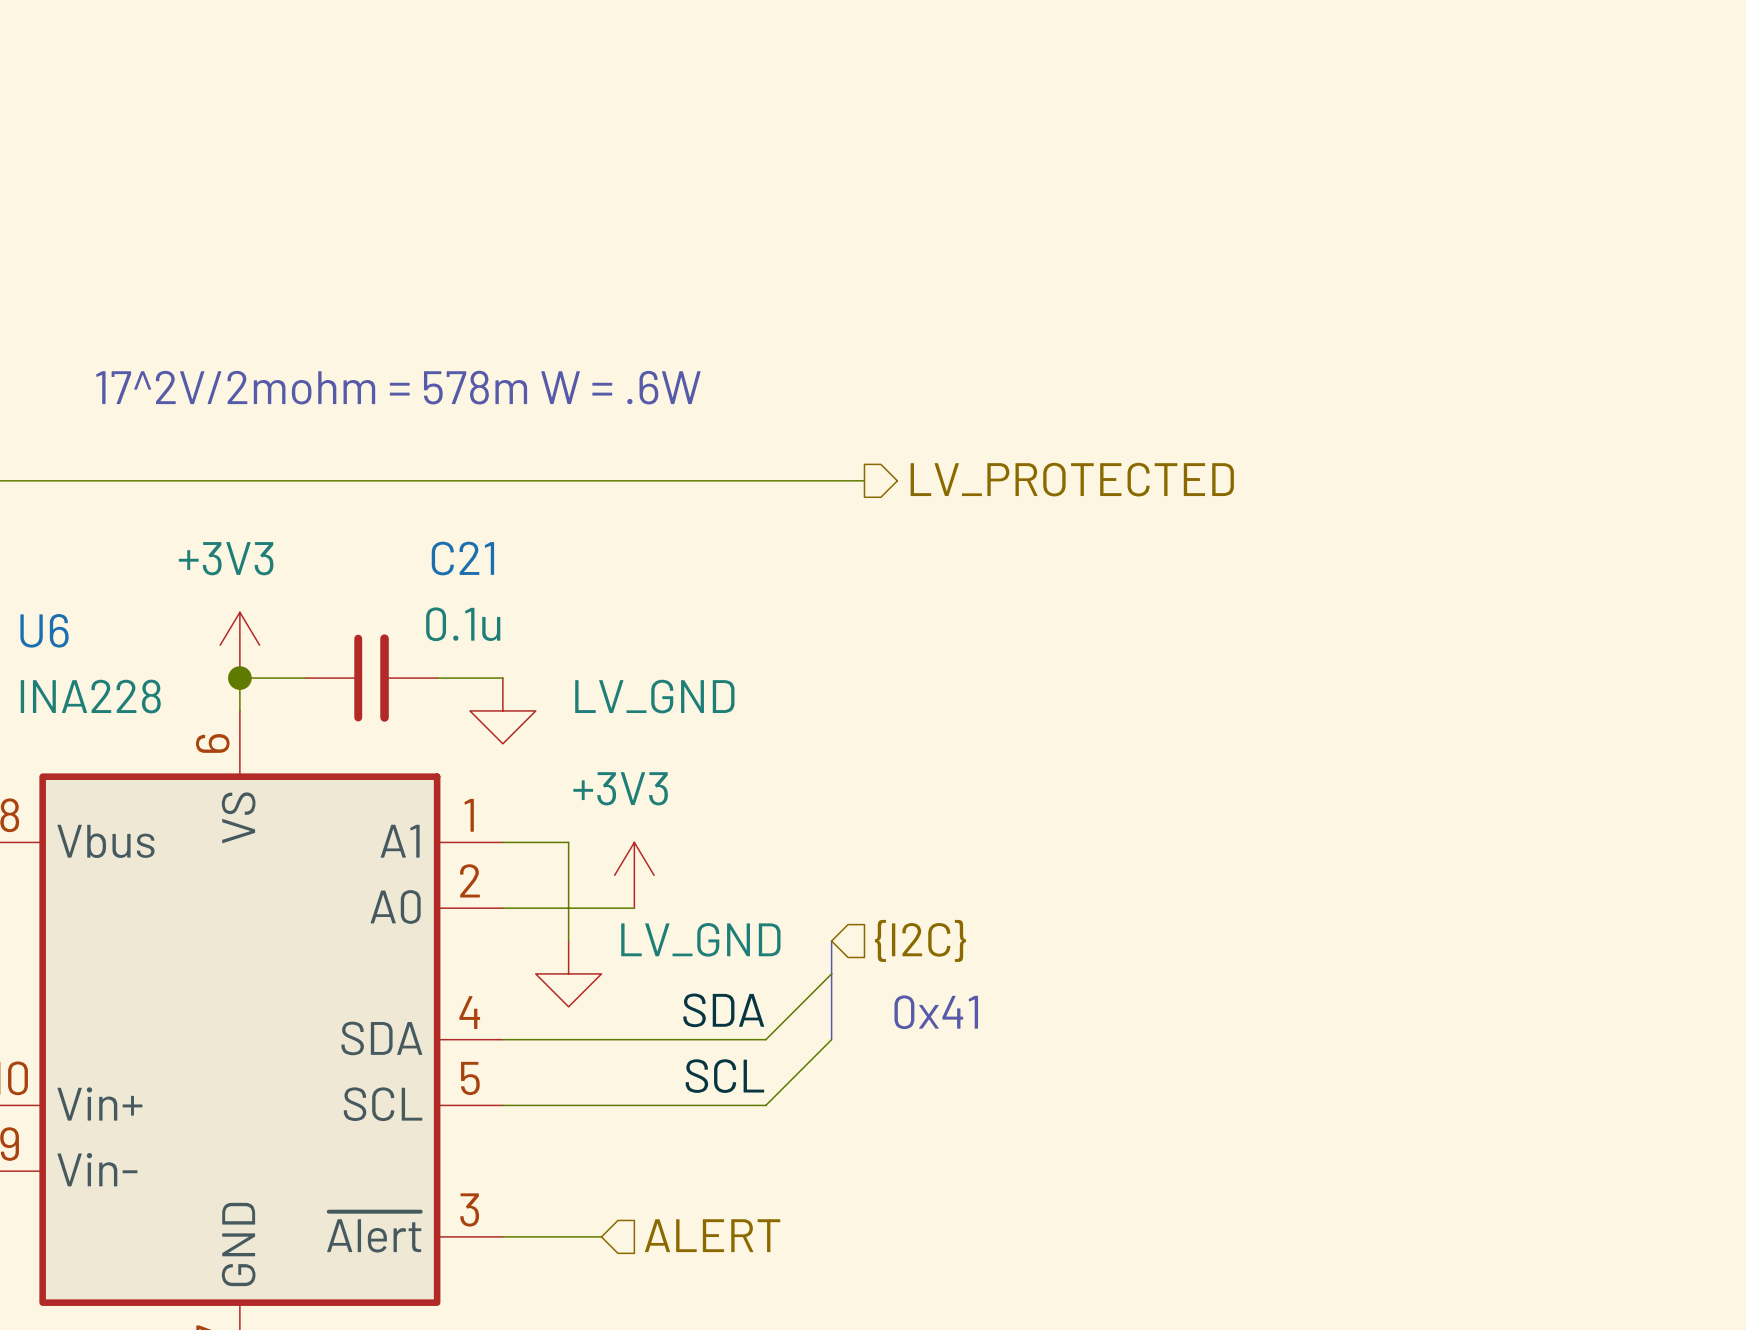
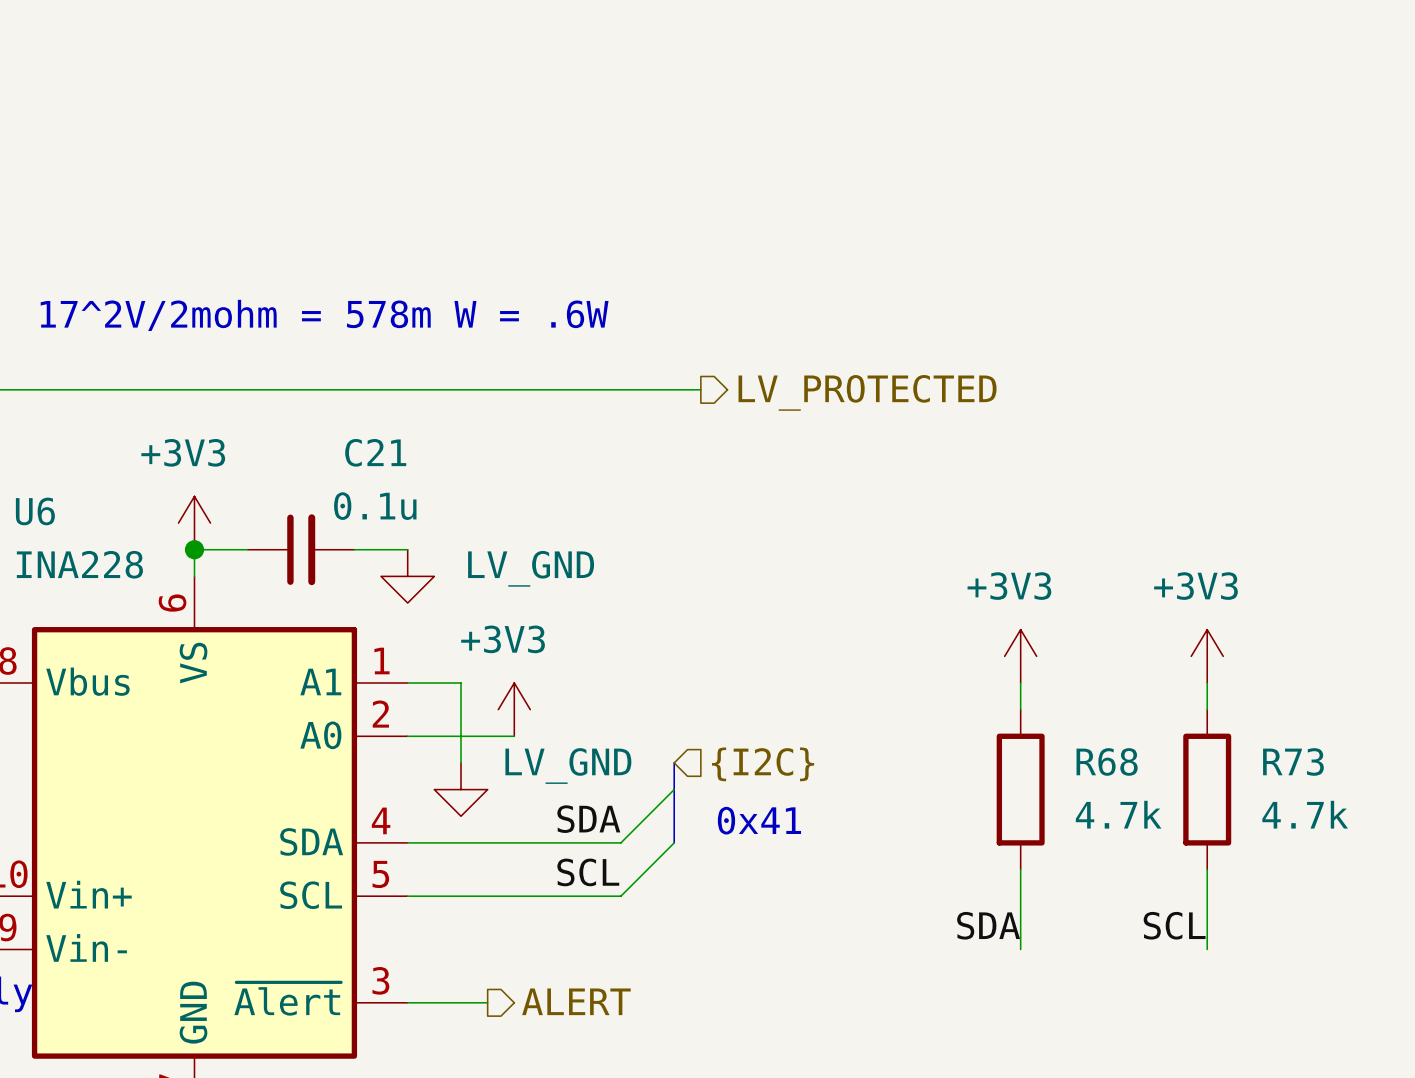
power symbol: none -> +3V3 (1020, 656)
power symbol: none -> +3V3 (1207, 656)
wire: none -> (1020, 682) (1020, 709)
wire: none -> (1207, 682) (1207, 709)
R68: none -> 4.7k (1020, 789)
R73: none -> 4.7k (1207, 789)
wire: none -> (1020, 869) (1020, 949)
wire: none -> (1207, 869) (1207, 949)
label: none -> SDA (988, 925)
label: none -> SCL (1174, 925)
hierarchical label shape: input (712, 1235) -> output (576, 1001)

